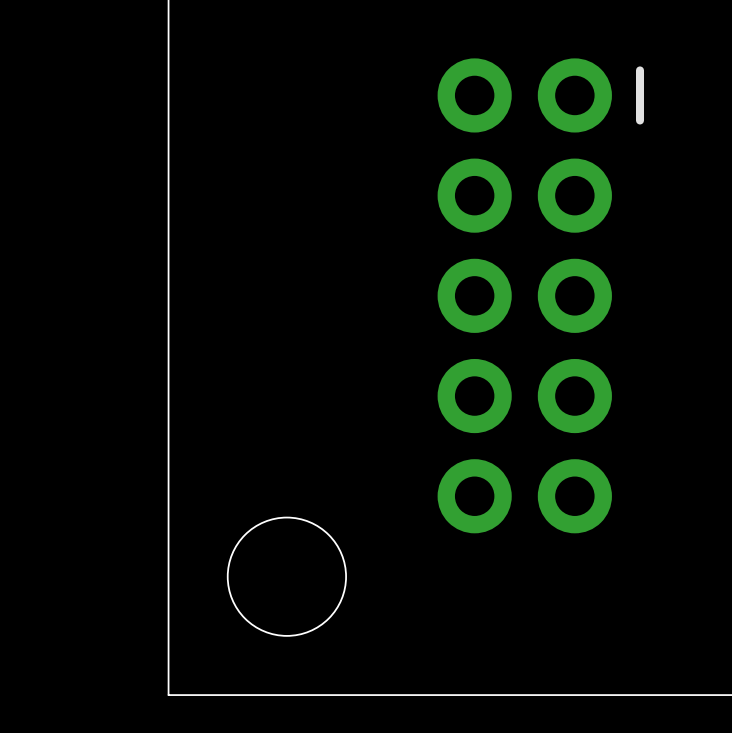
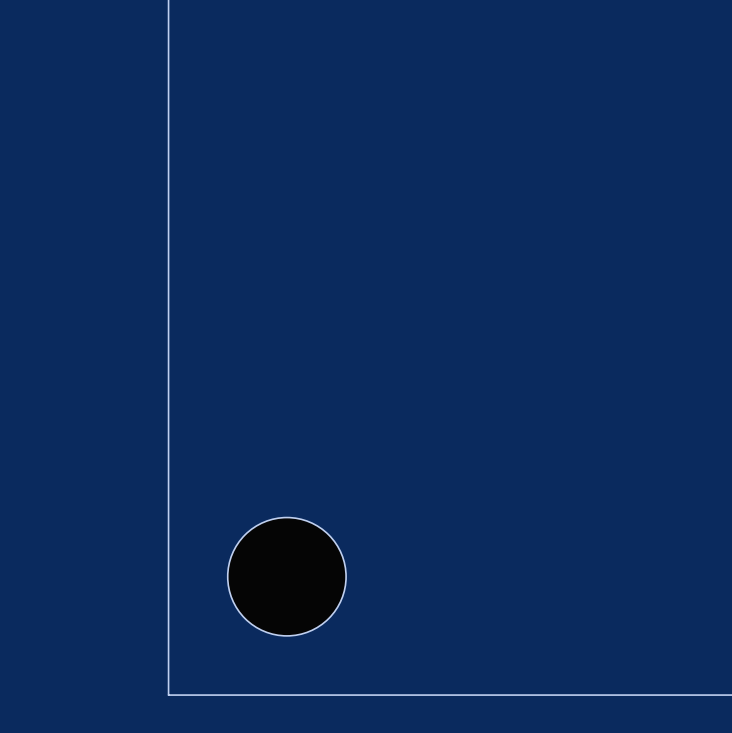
part: (540, 295) -> none

